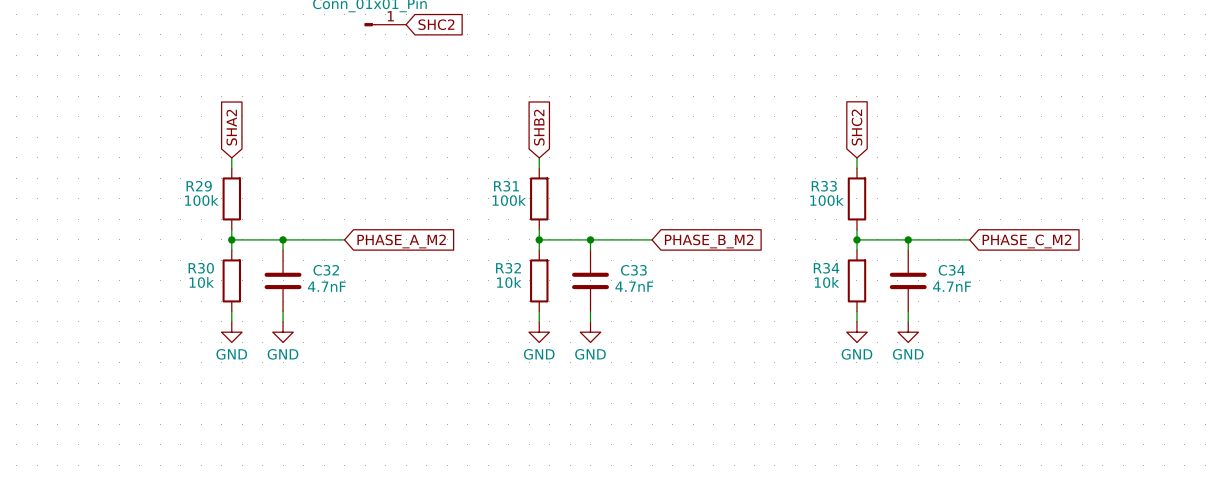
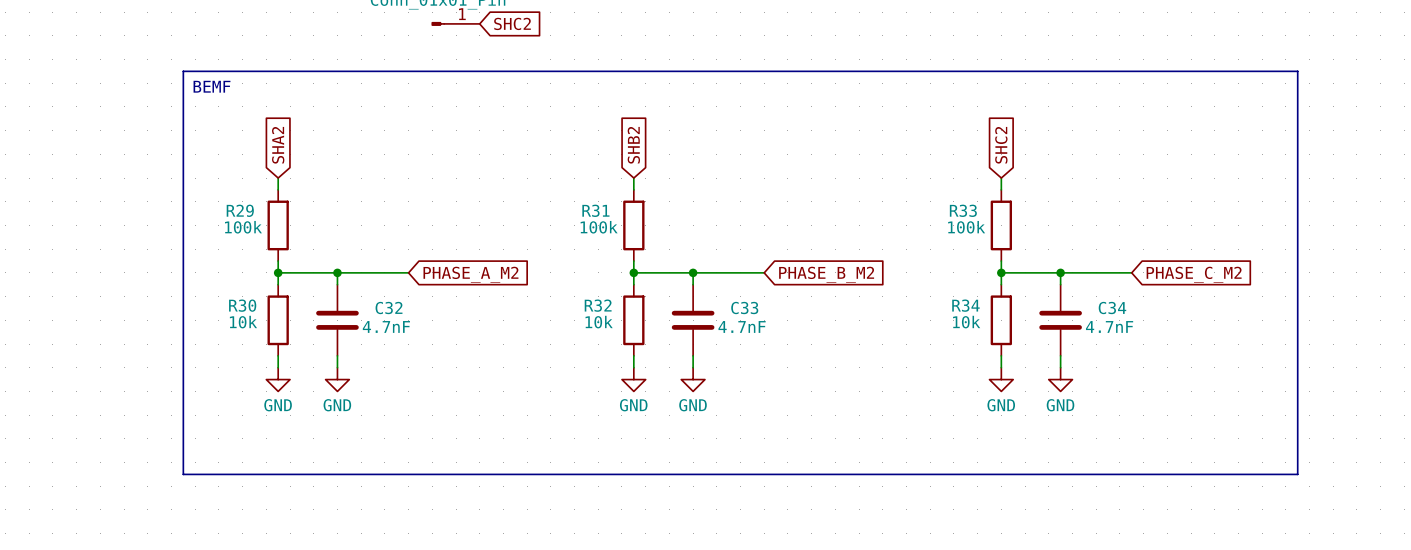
line: none -> (183, 71) (1297, 71) (1297, 474) (183, 474) (183, 71)
text: none -> BEMF (211, 86)

